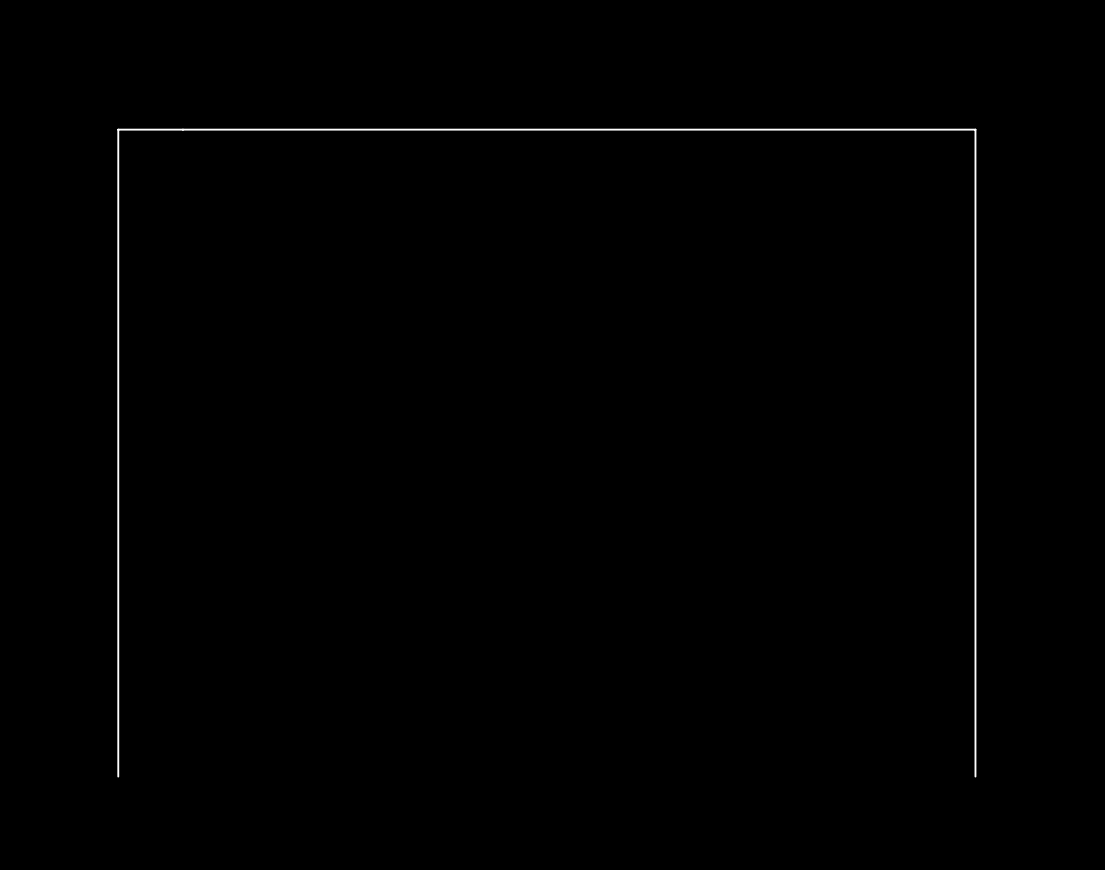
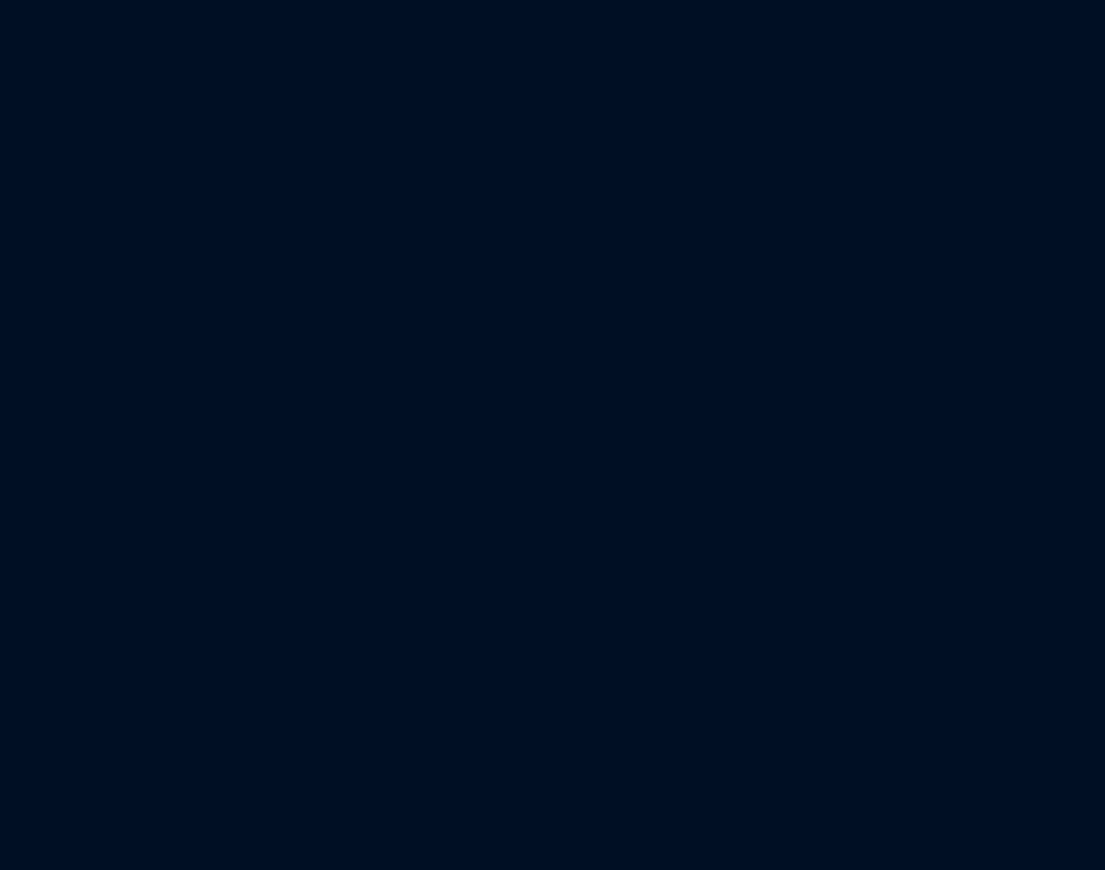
board edge: (118, 776) (118, 129) (975, 129) (975, 776) -> none

